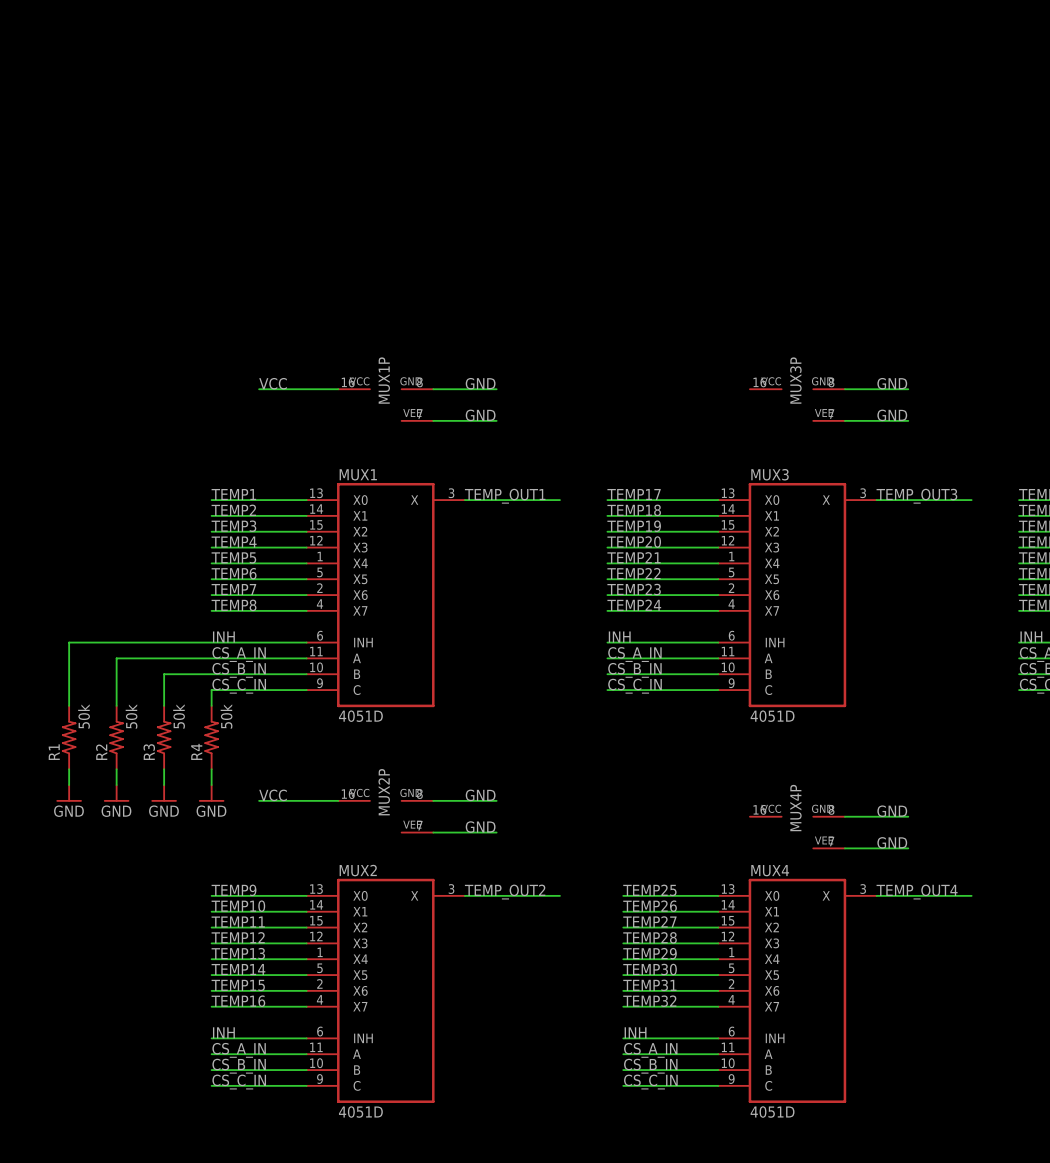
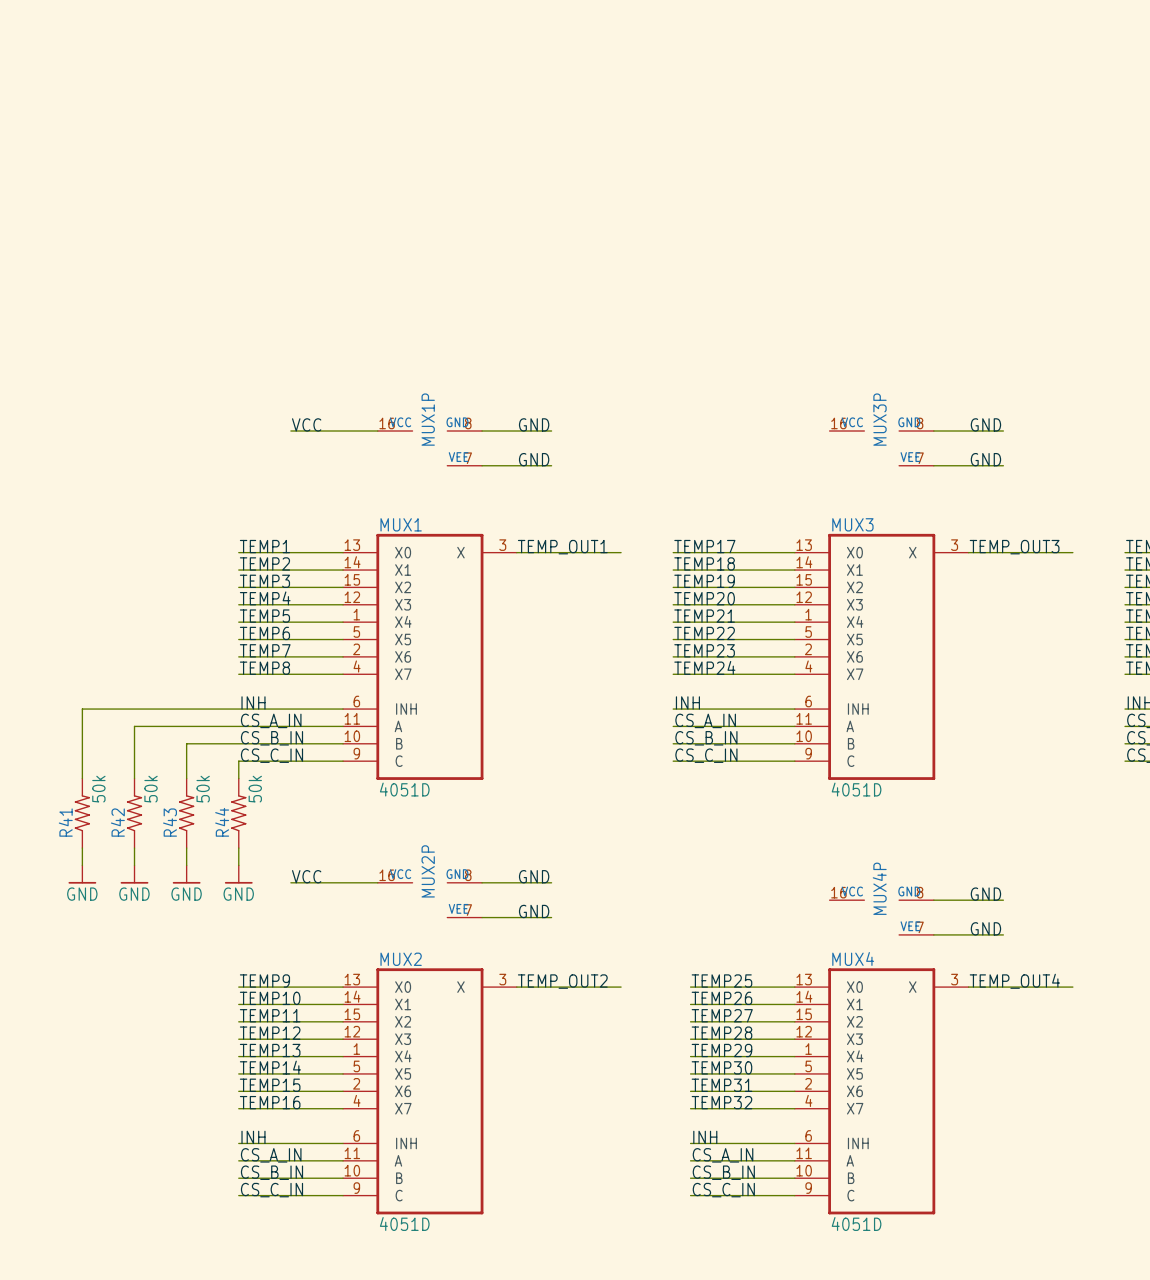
R4 name: R4 (196, 751) -> R44 (222, 822)
R1 name: R1 (54, 752) -> R41 (65, 822)
R2 name: R2 (101, 752) -> R42 (117, 822)
R3 name: R3 (149, 752) -> R43 (170, 822)

